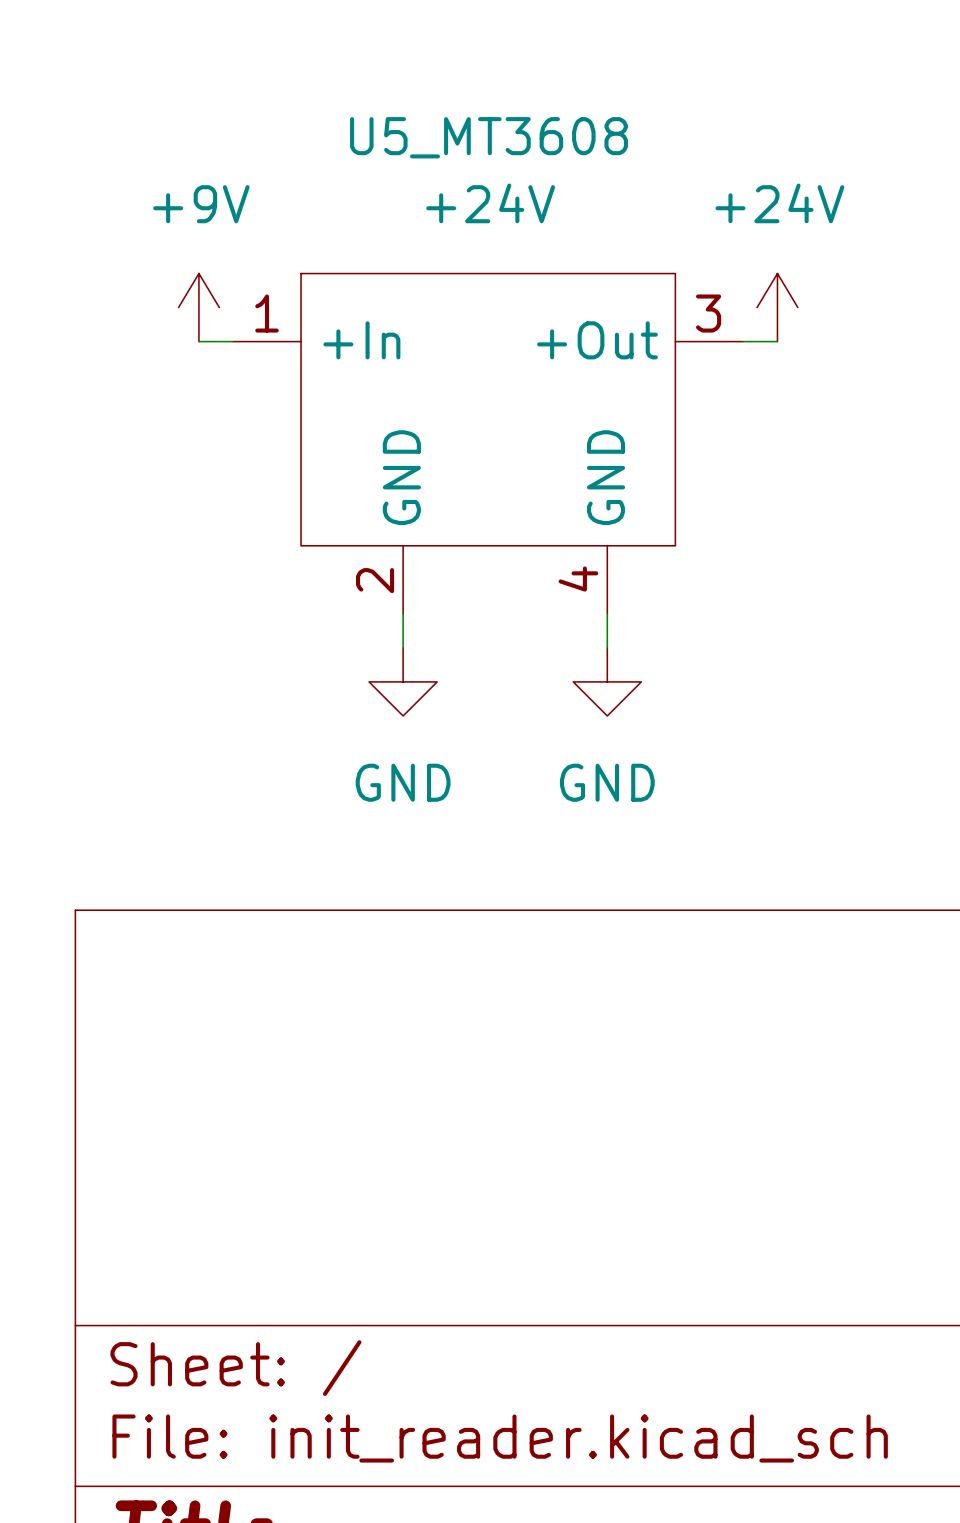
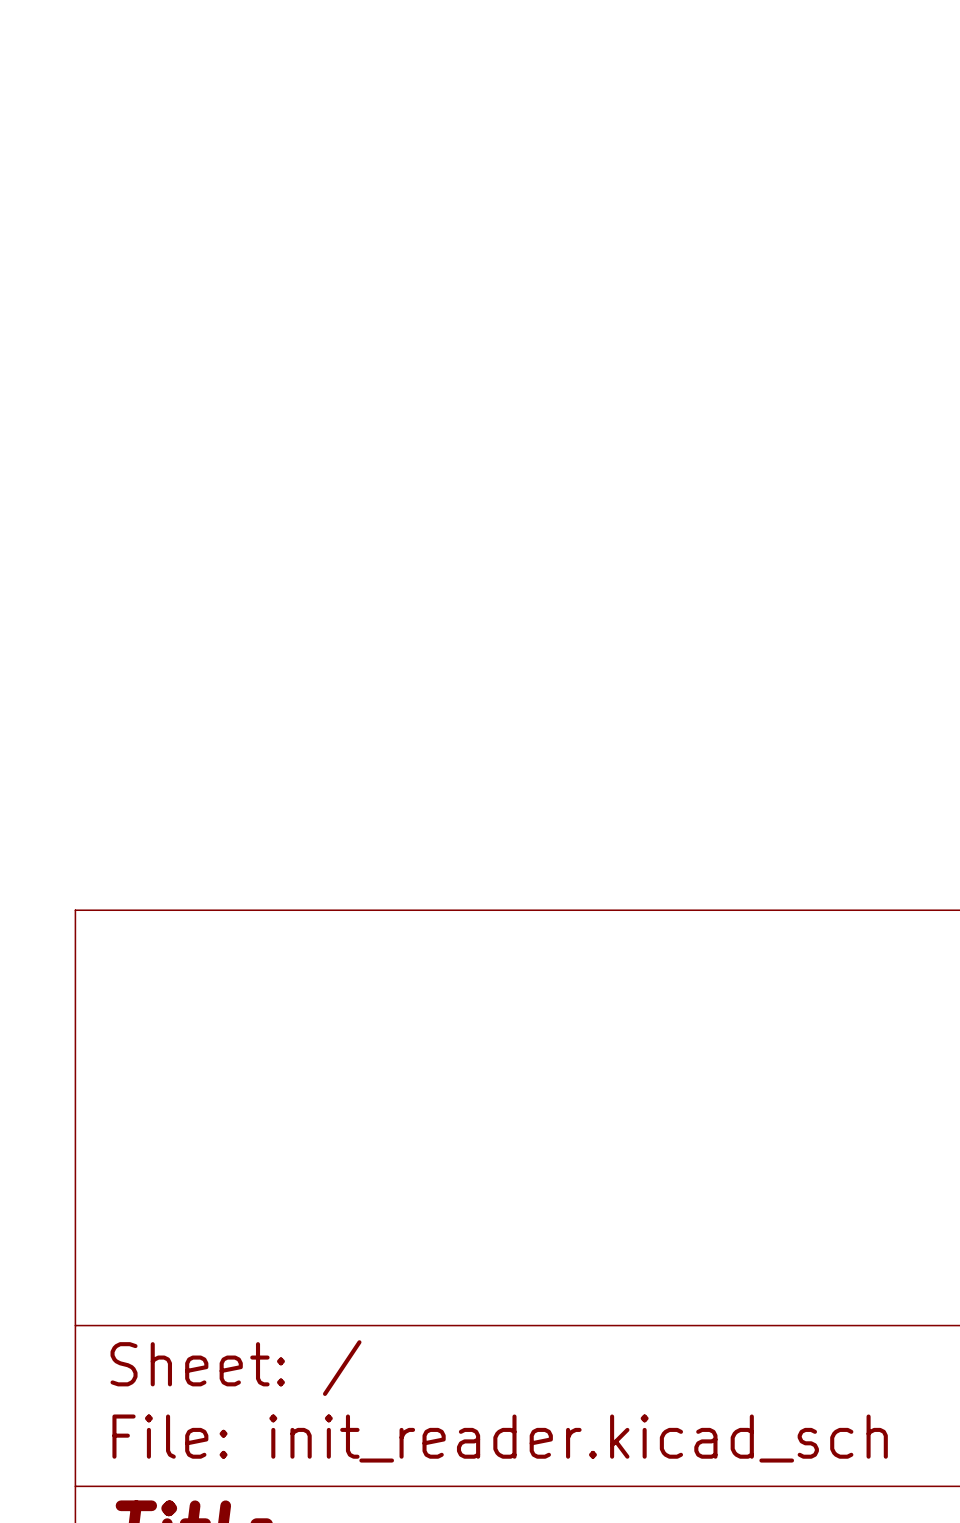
power symbol: +9V (198, 307) -> none
power symbol: +24V (777, 307) -> none
wire: (198, 341) (232, 341) -> none
wire: (743, 341) (777, 341) -> none
U5_MT3608: +24V (488, 443) -> none
wire: (403, 613) (403, 647) -> none
wire: (607, 613) (607, 647) -> none
power symbol: GND (403, 681) -> none
power symbol: GND (607, 681) -> none

